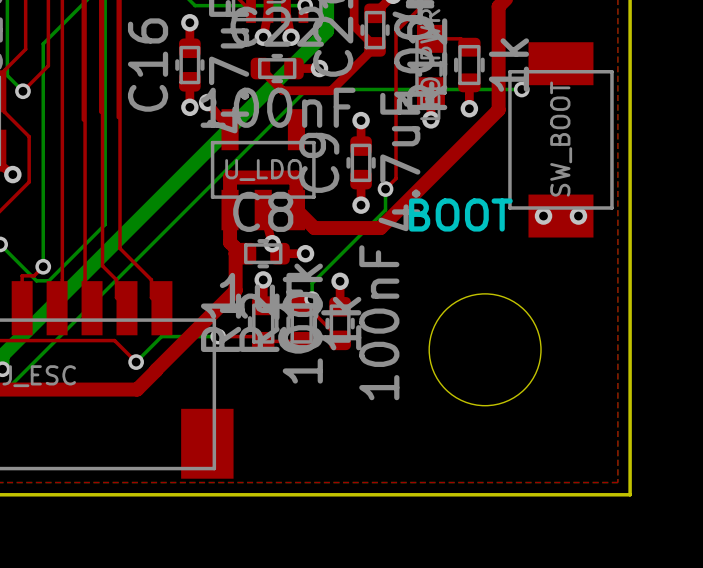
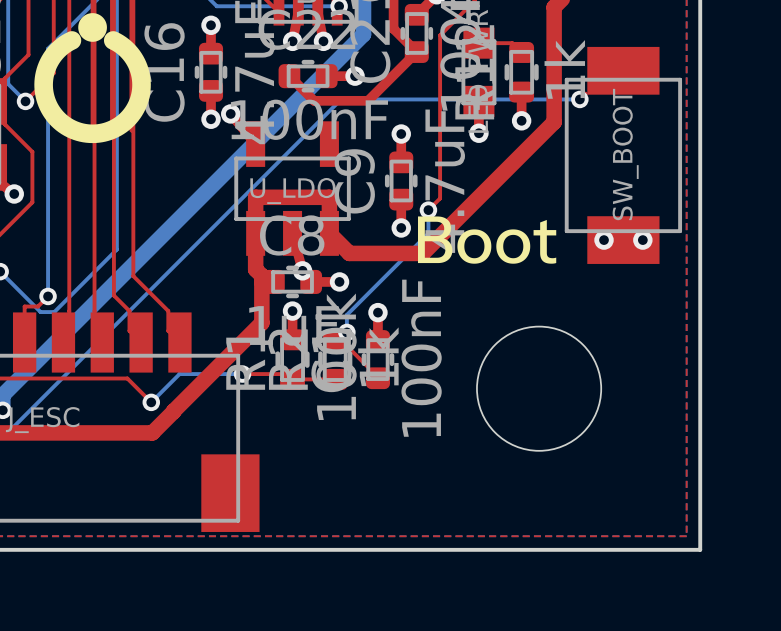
drawing: none -> [34, 13, 151, 144]
drawing: none -> [417, 216, 557, 264]
text: BOOT (460, 214) -> none

